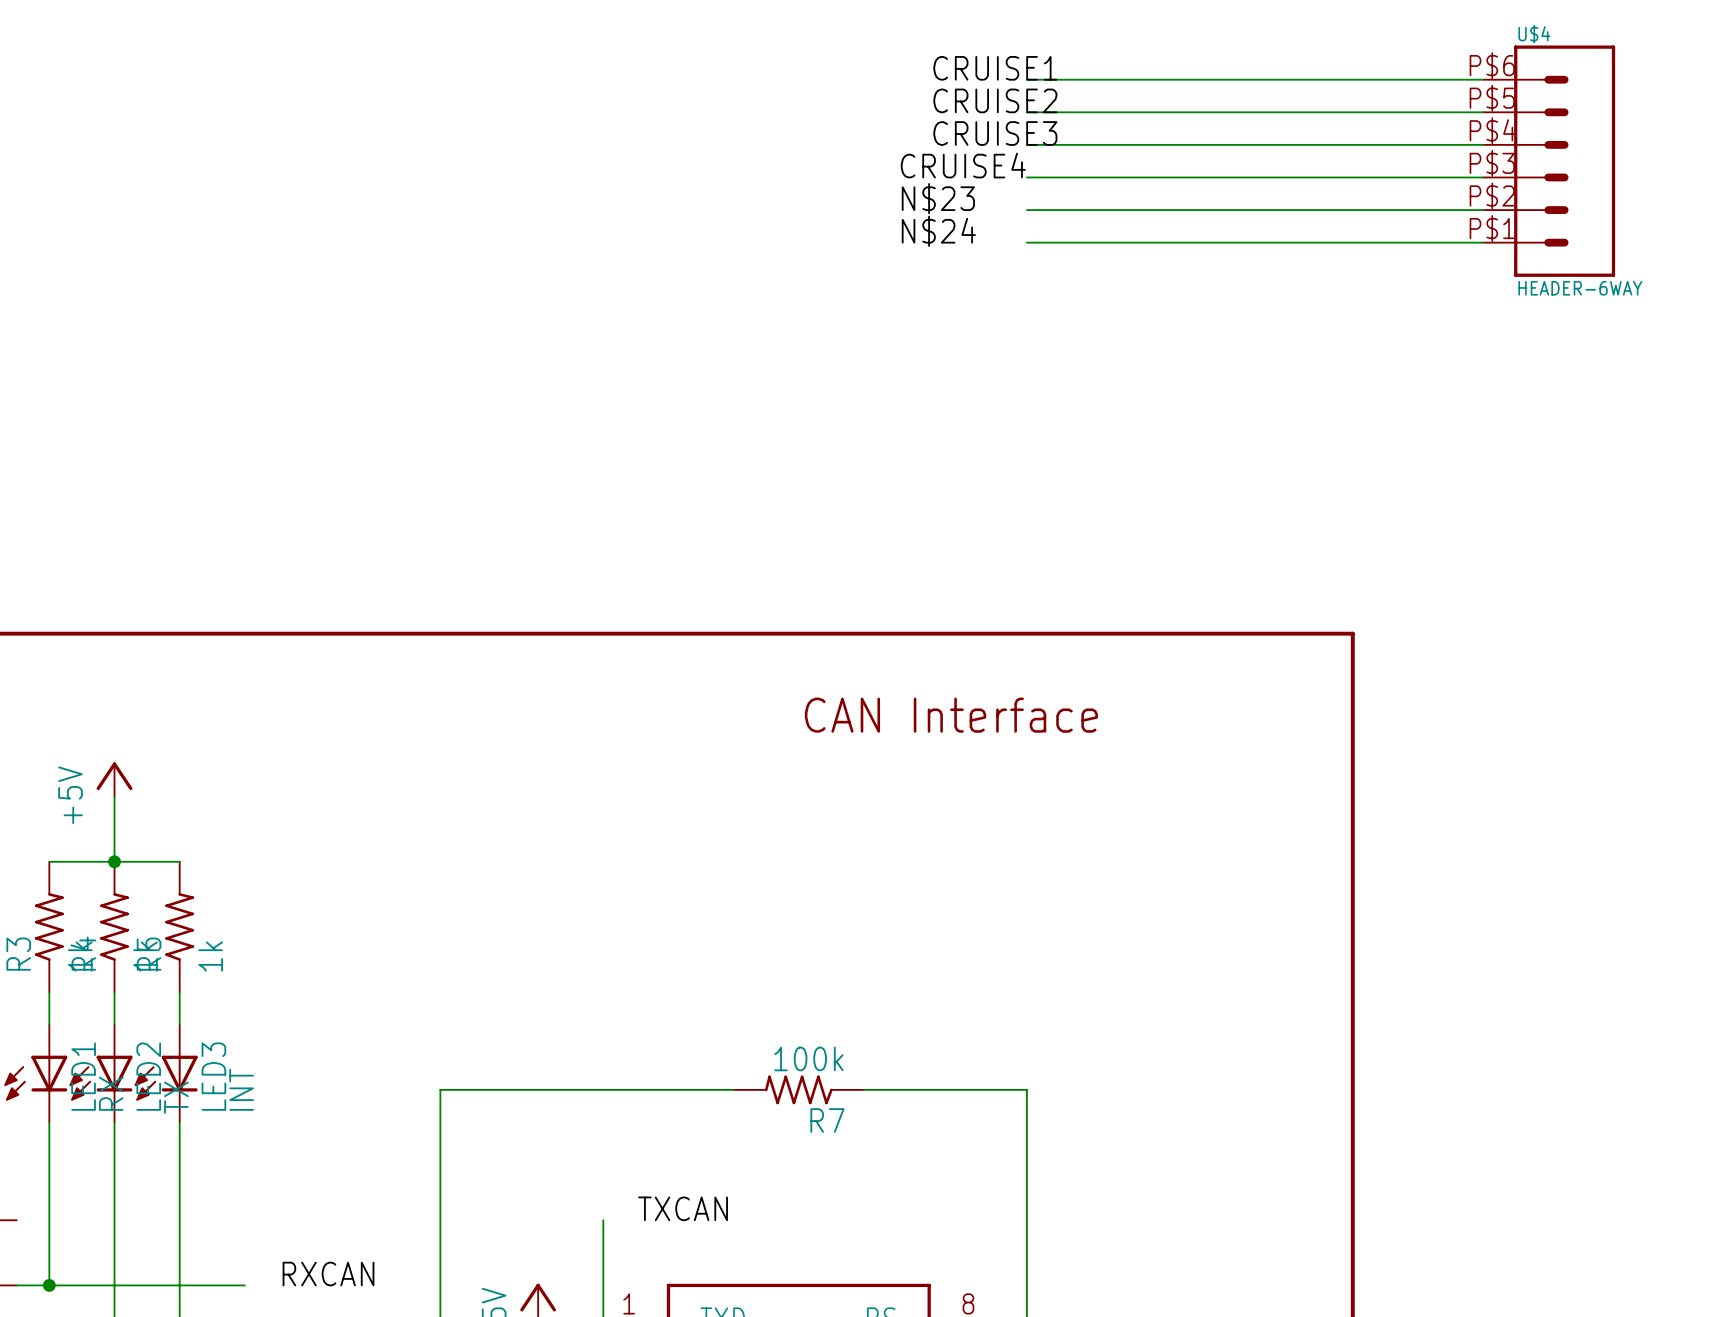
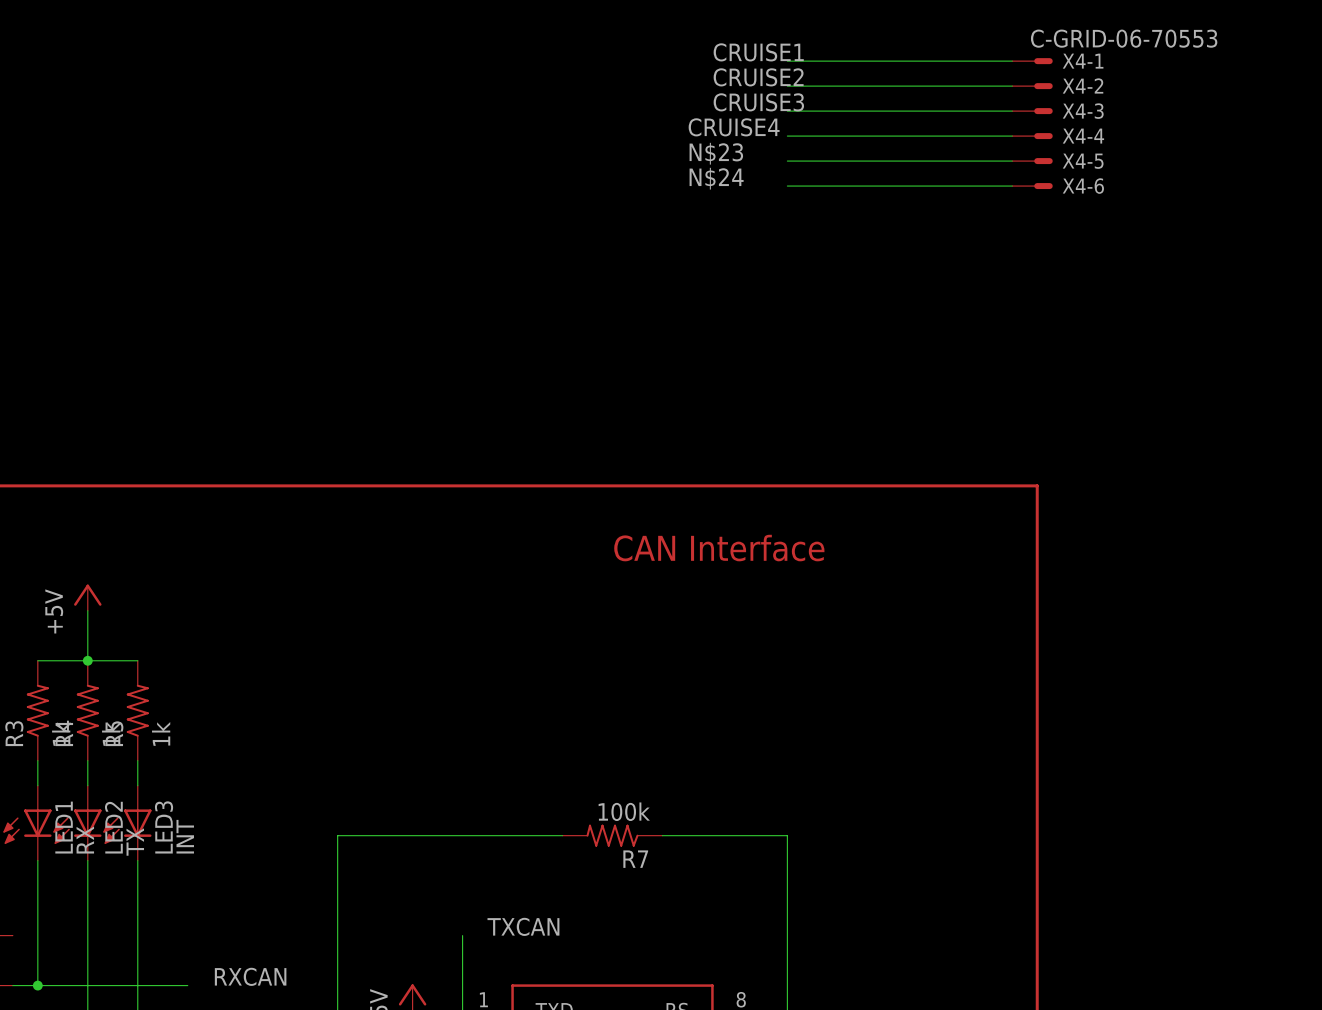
wire: (1320, 79) (1483, 79) -> none
X4-1: none -> C-GRID-06-70553 (1032, 61)
wire: (1320, 112) (1483, 112) -> none
X4-2: none -> (1032, 86)
wire: (1320, 144) (1483, 144) -> none
X4-3: none -> (1032, 111)
U$4: HEADER-6WAY (1549, 161) -> none
wire: (1320, 177) (1483, 177) -> none
X4-4: none -> (1032, 136)
wire: (1320, 210) (1483, 210) -> none
X4-5: none -> (1032, 161)
wire: (1320, 242) (1483, 242) -> none
X4-6: none -> (1032, 186)

